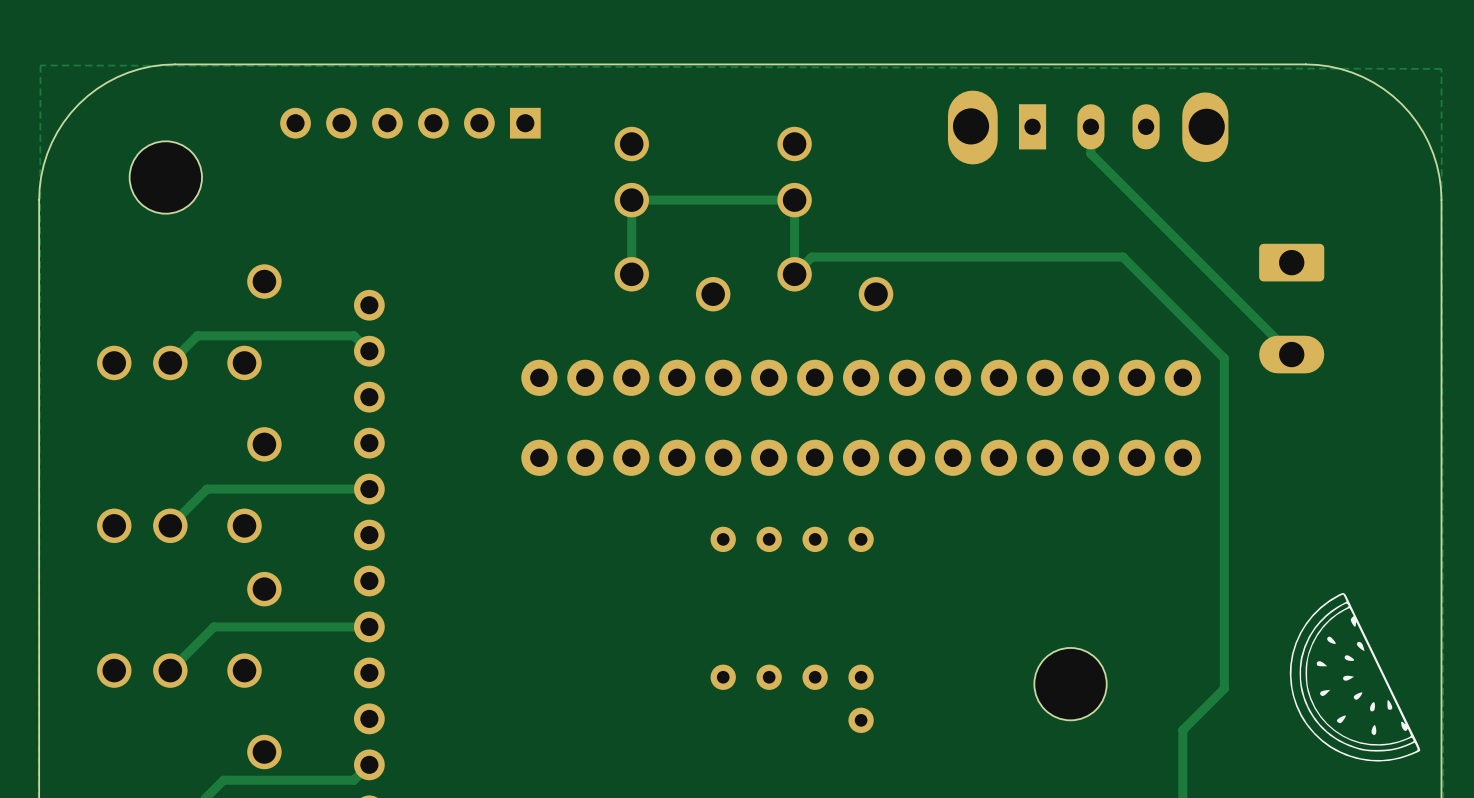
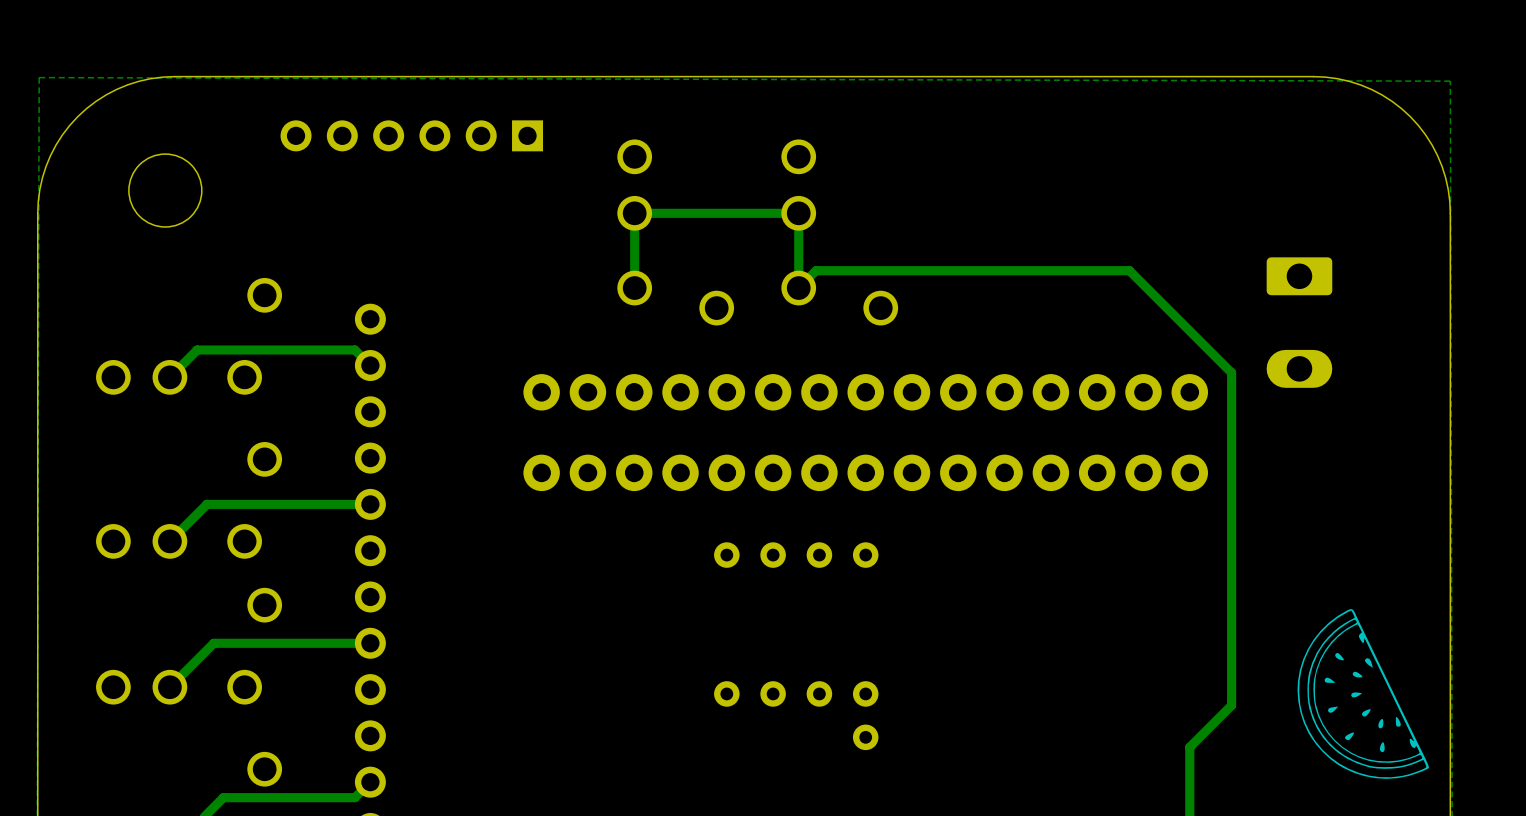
track: (1090, 126) (1090, 153) (1291, 354) -> none
part: (1088, 127) -> none
part: (1070, 684) -> none

